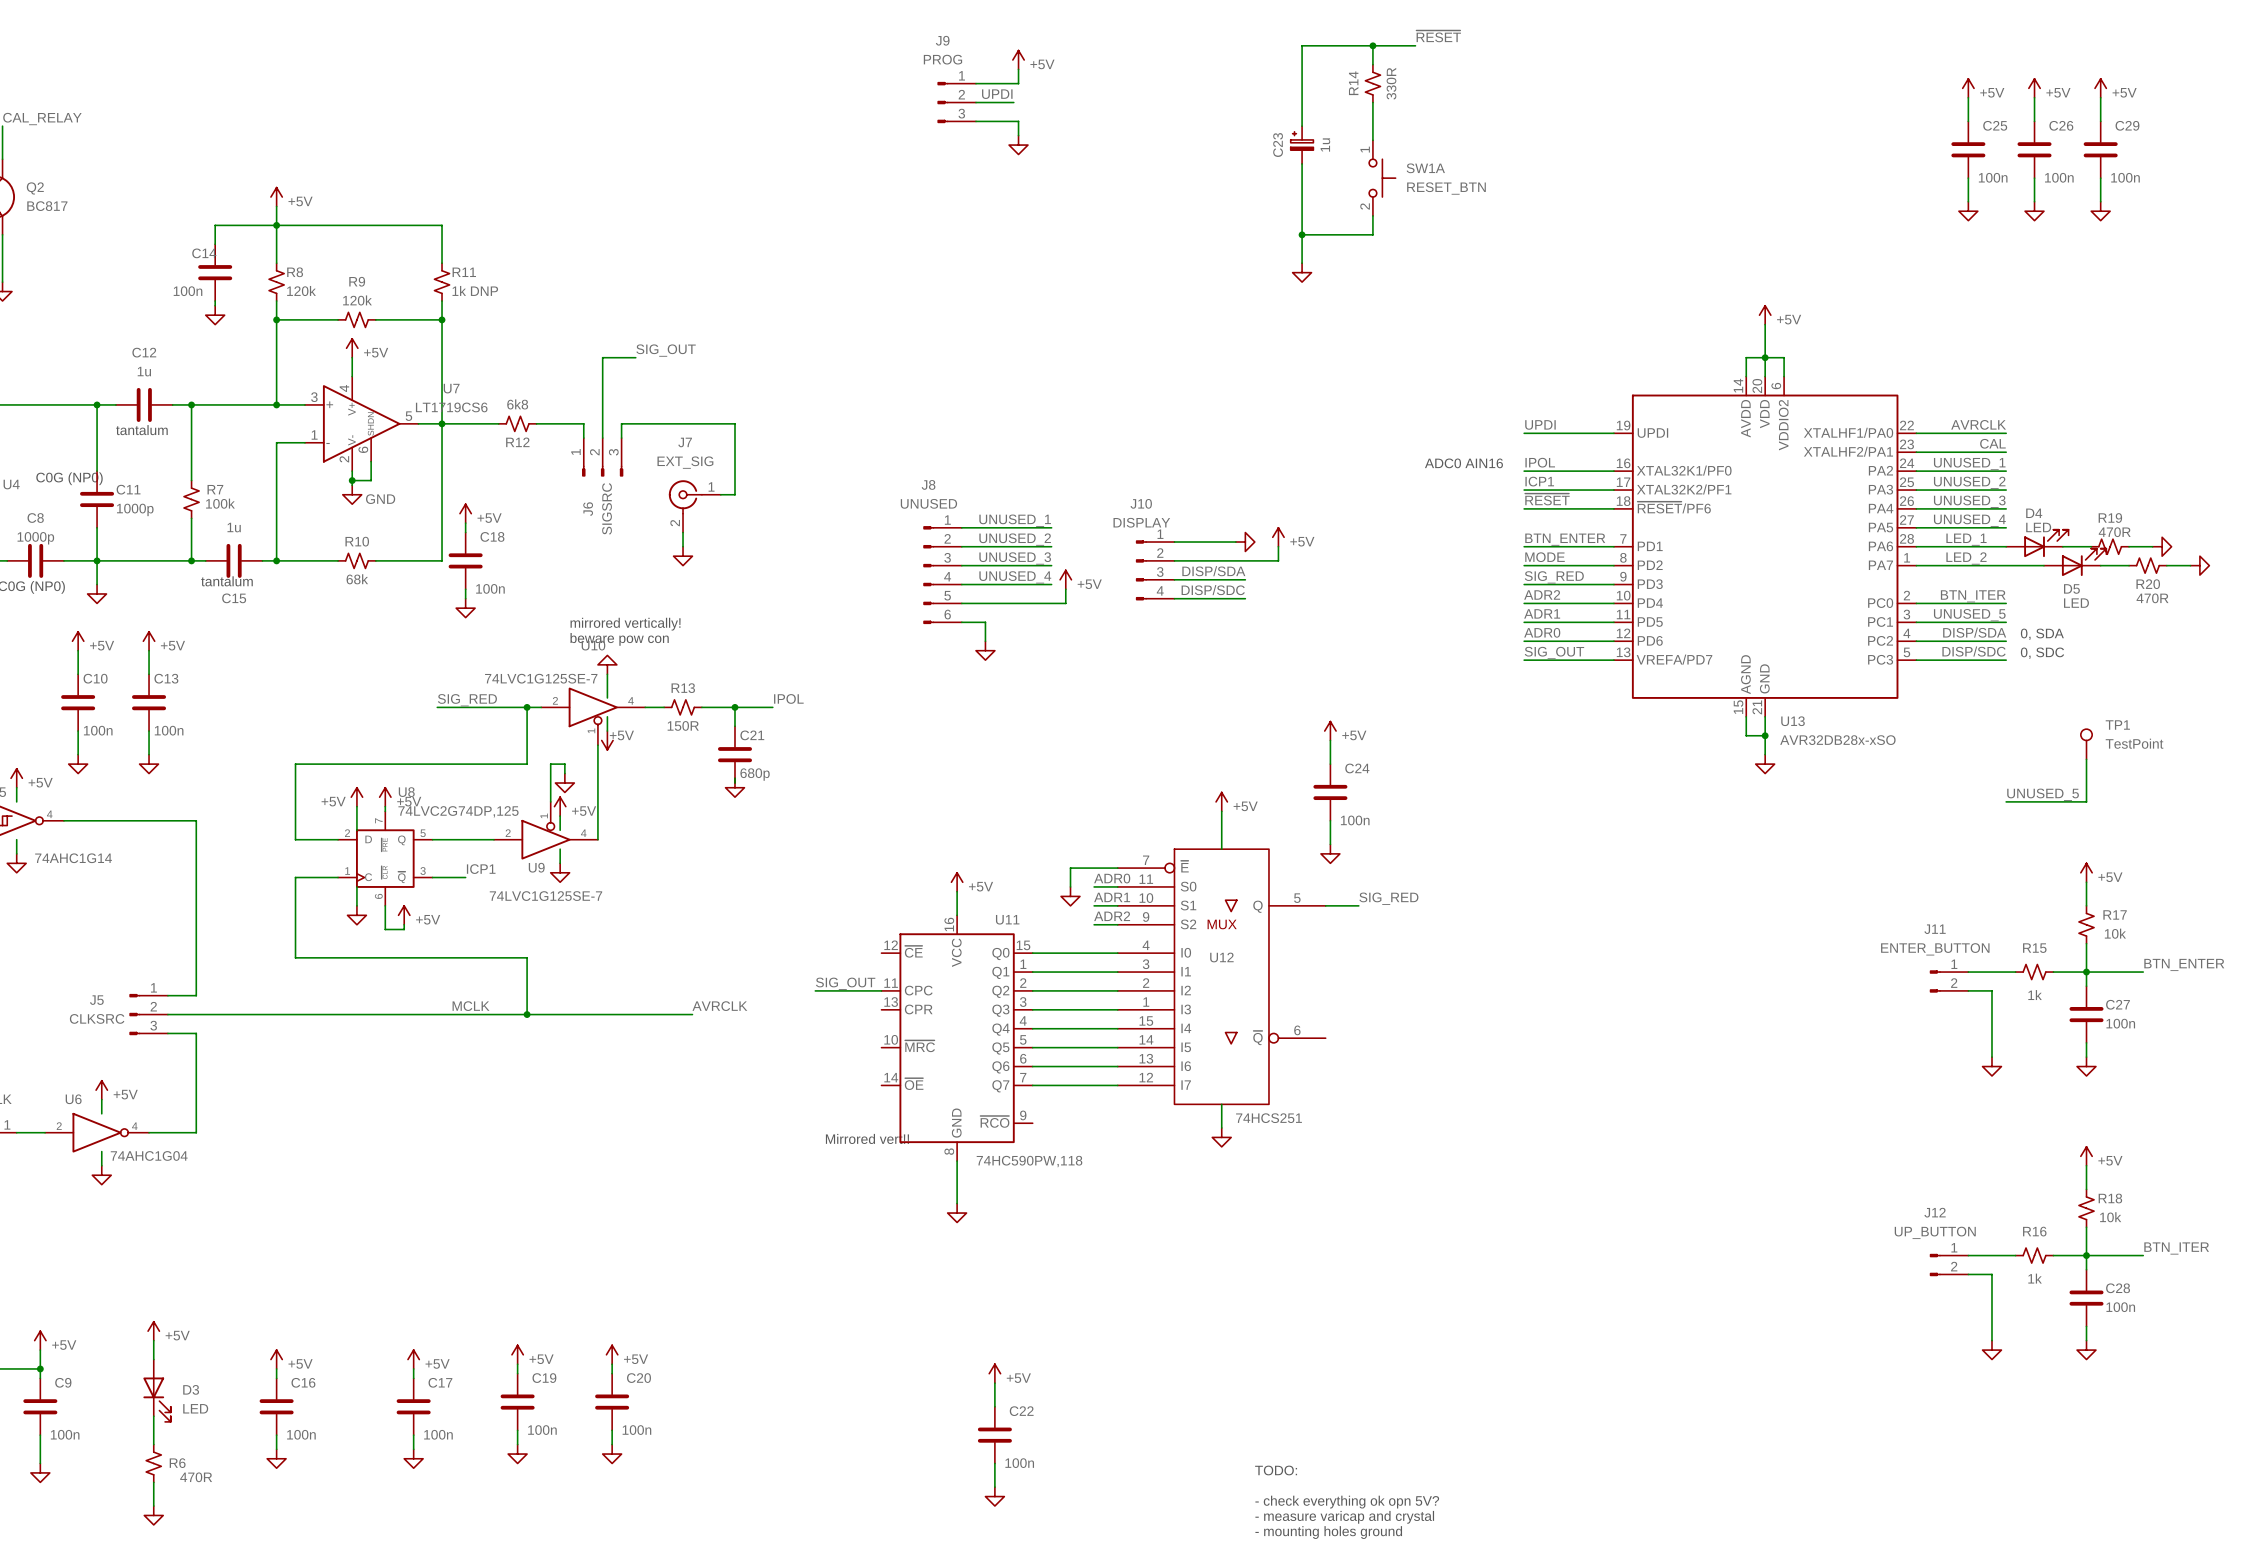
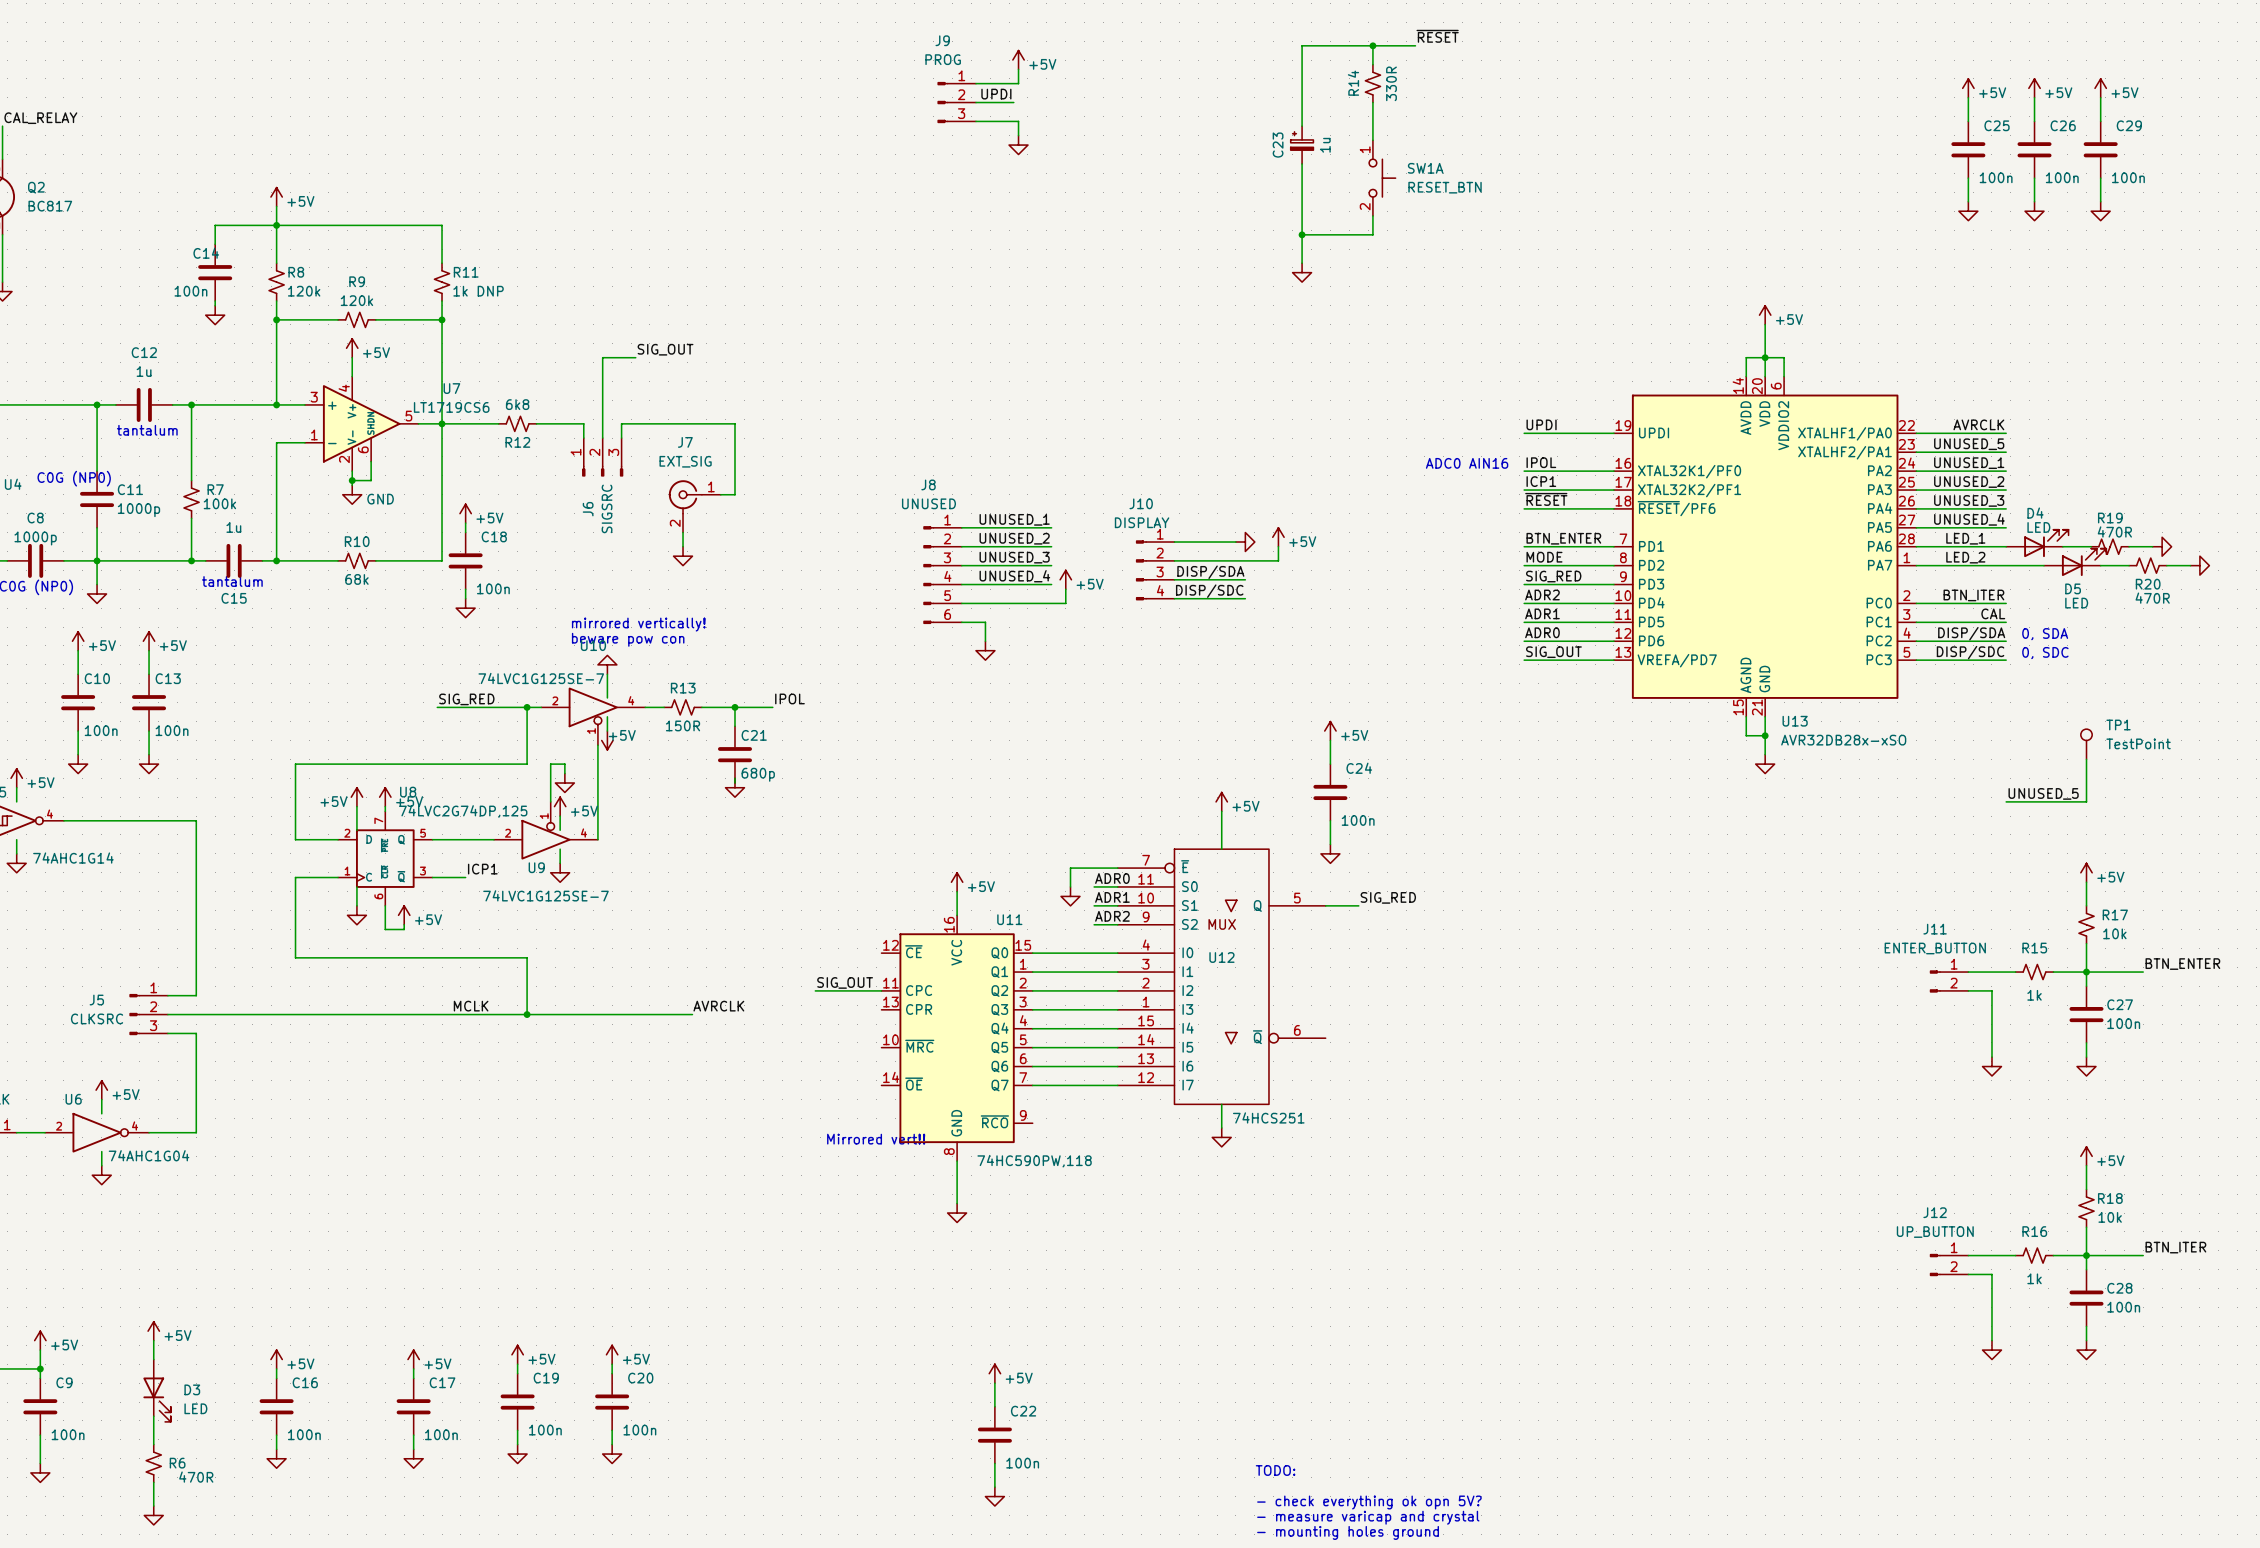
label: CAL (1992, 443) -> UNUSED_5 (1969, 444)
label: UNUSED_5 (1969, 615) -> CAL (1993, 613)

